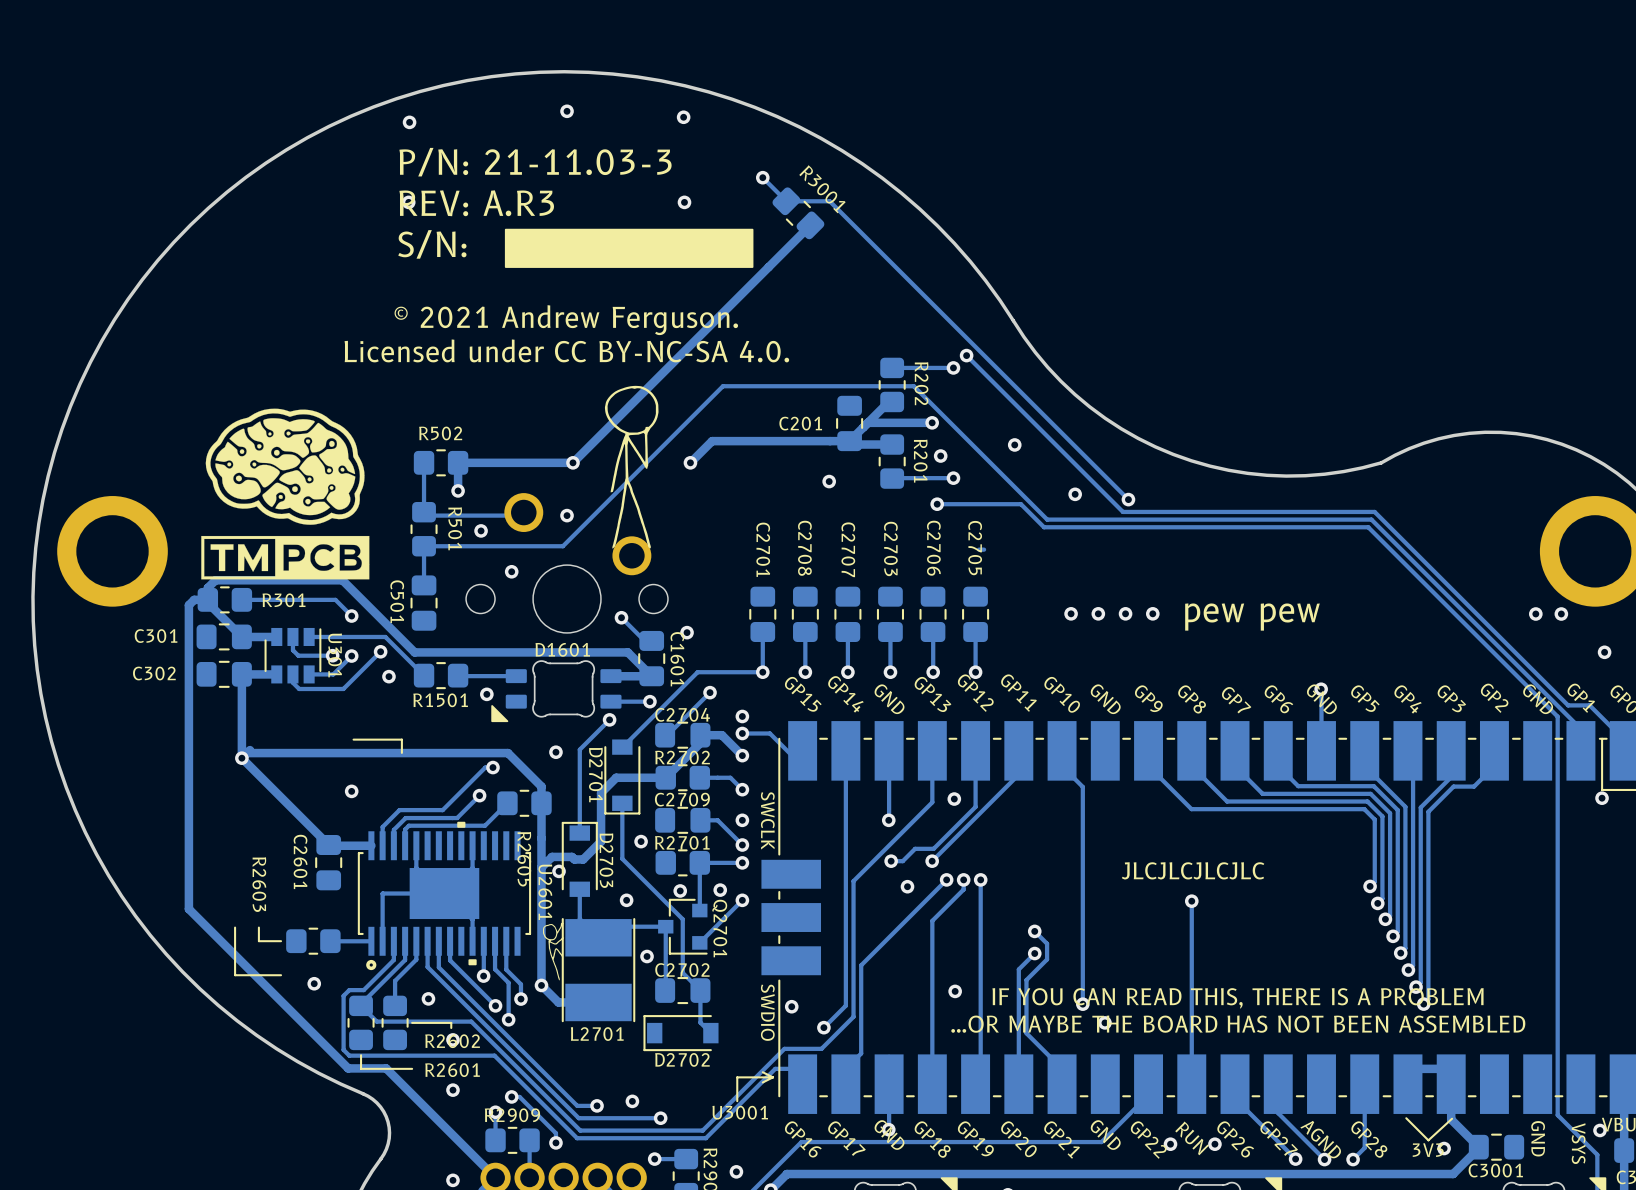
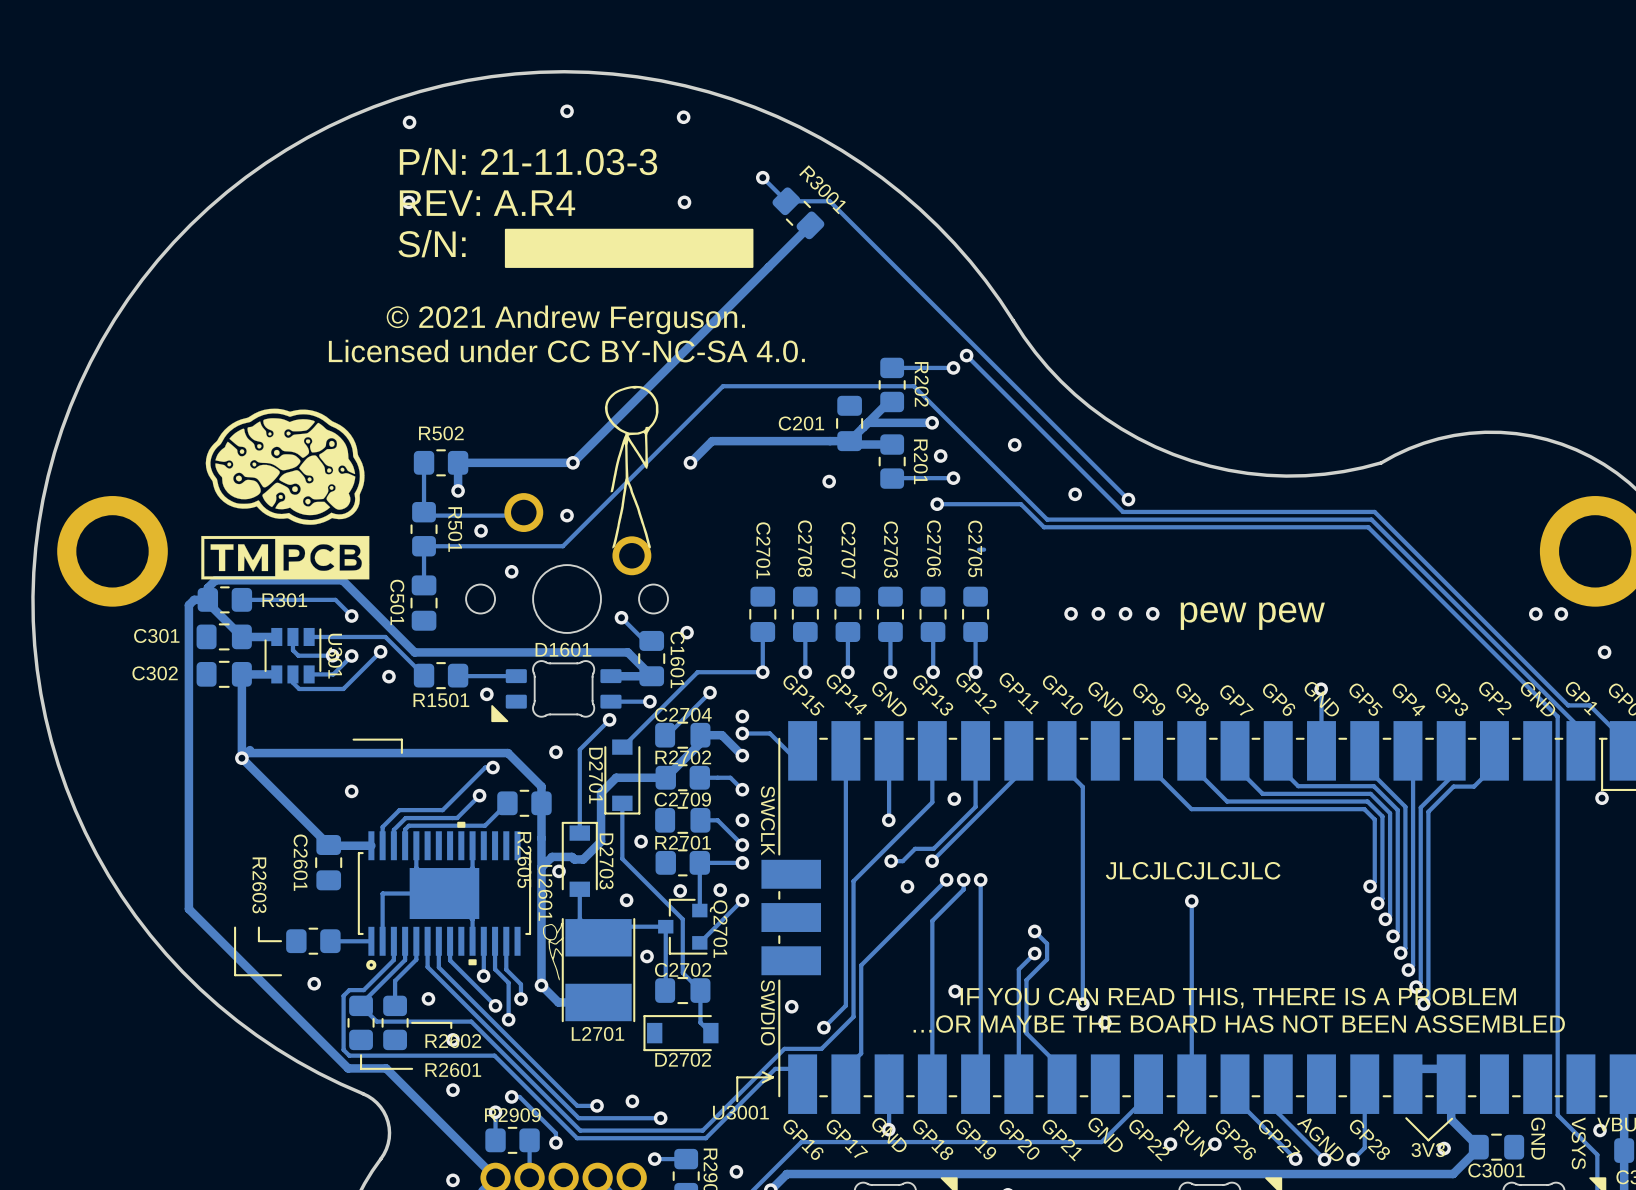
text: REV: A.R3 (476, 203) -> REV: A.R4 (487, 203)

